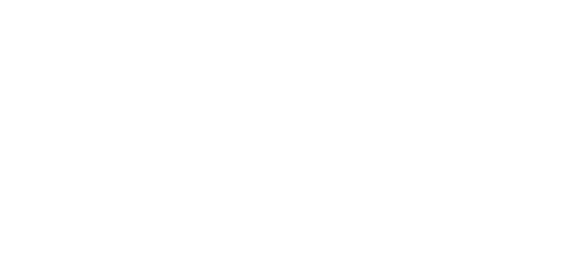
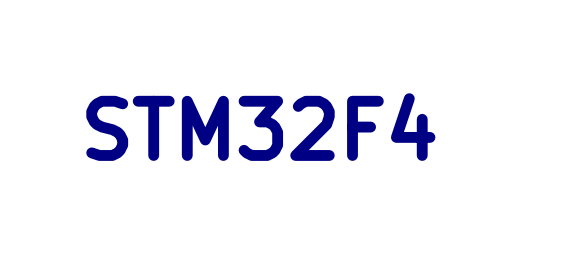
text: none -> STM32F4 (260, 127)

